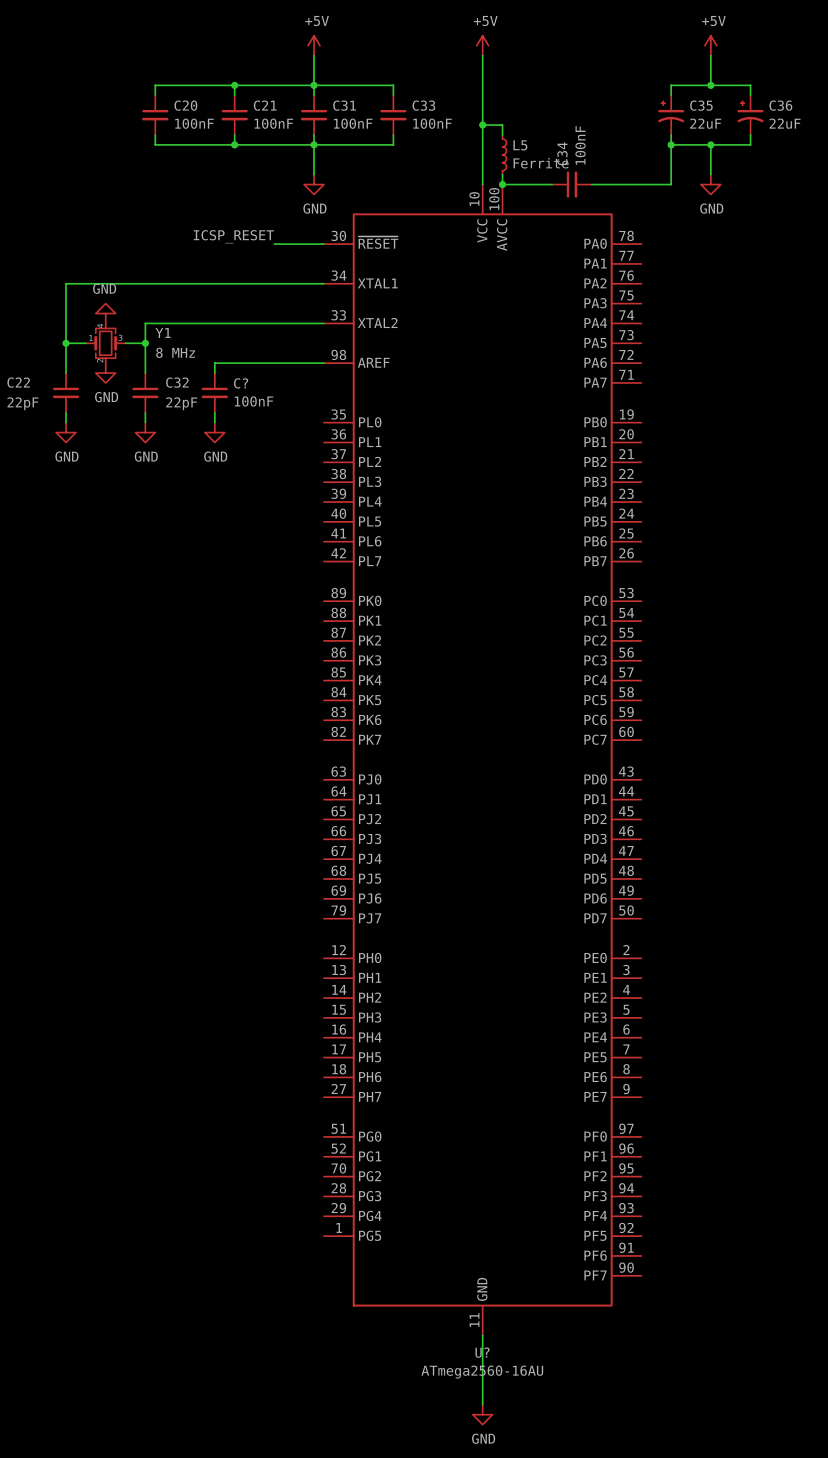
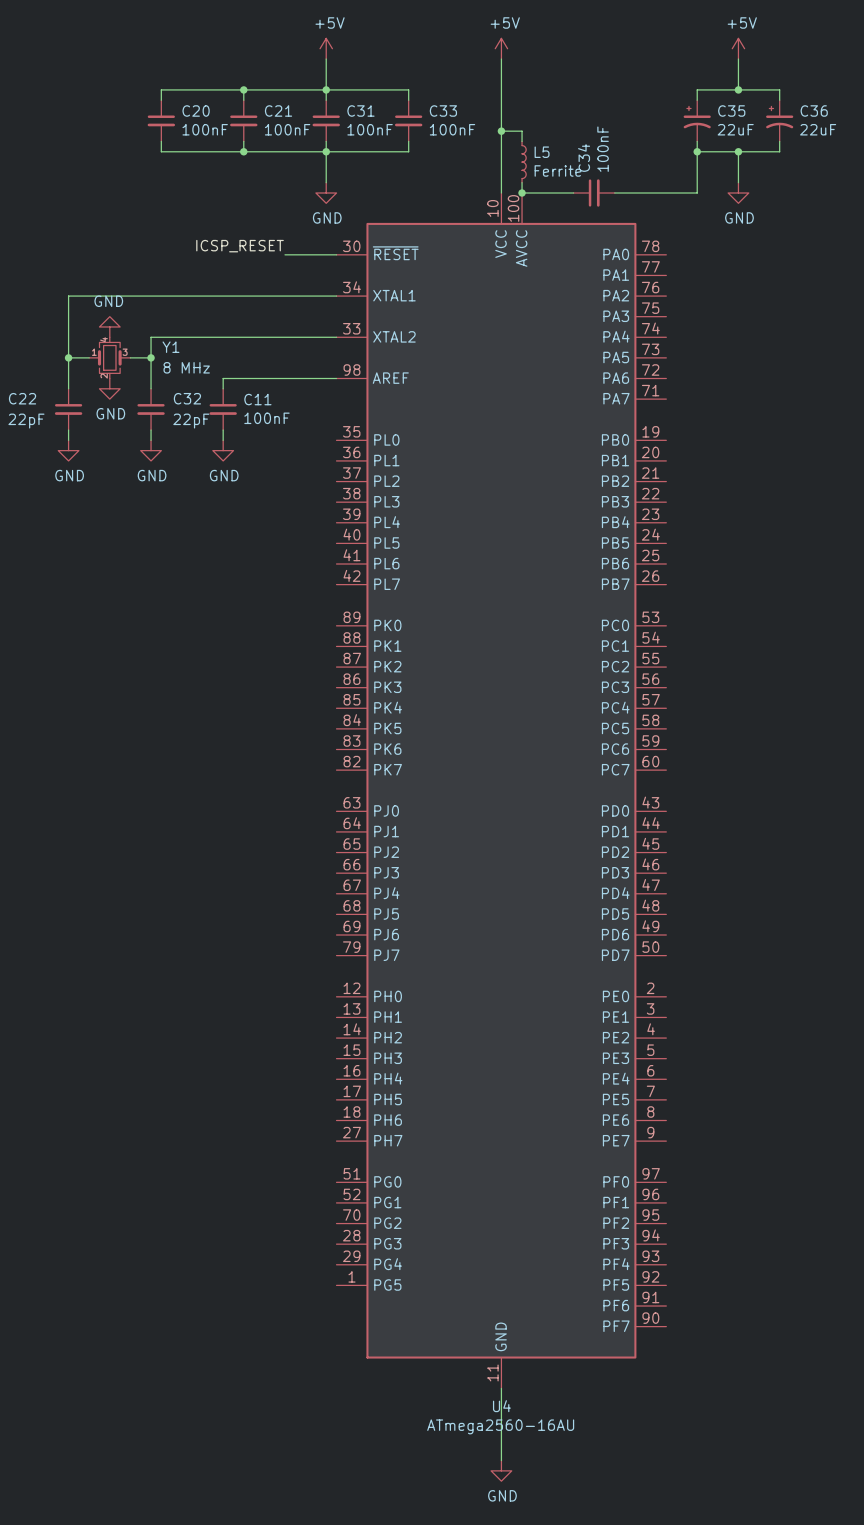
C? name: C? (241, 383) -> C11 (257, 399)
U? name: U? (482, 1352) -> U4 (501, 1406)

